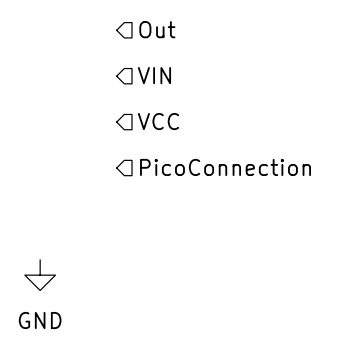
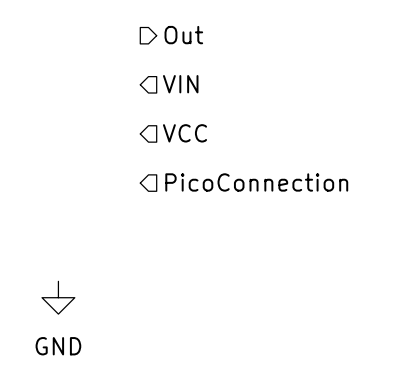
hierarchical label shape: input (157, 29) -> output (183, 35)

